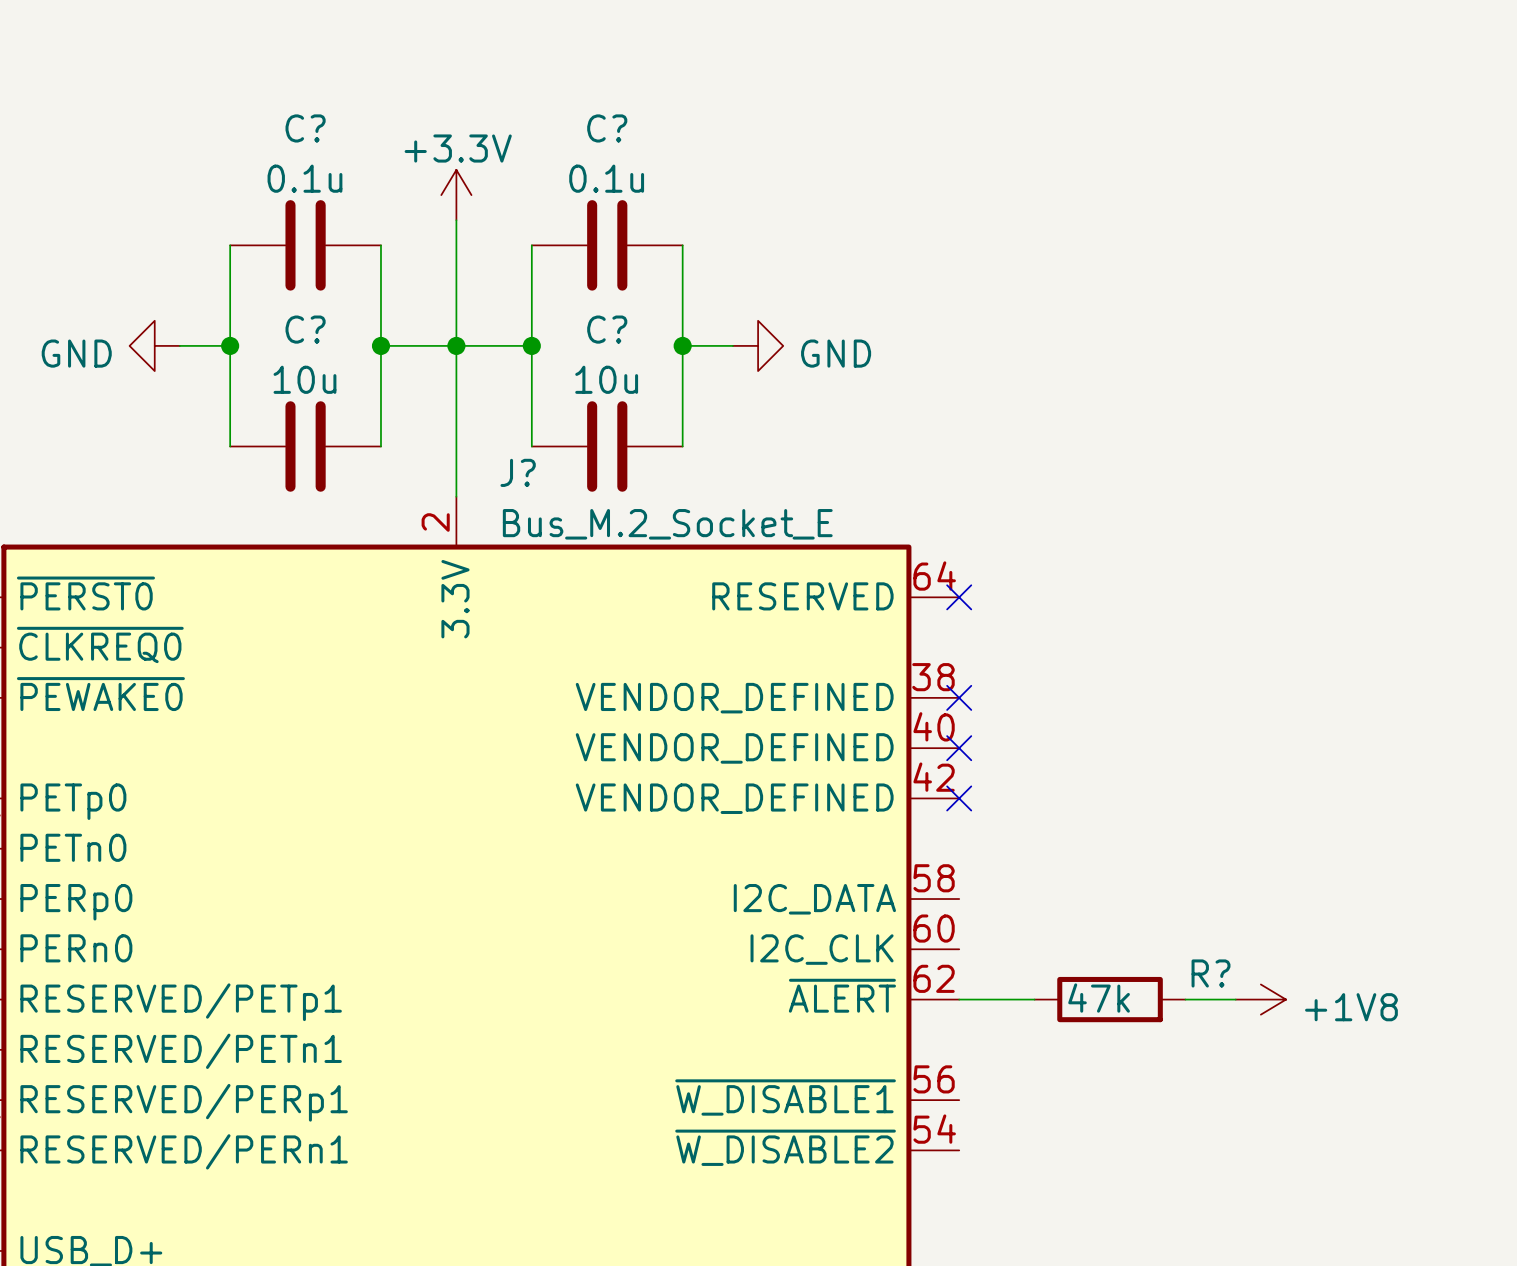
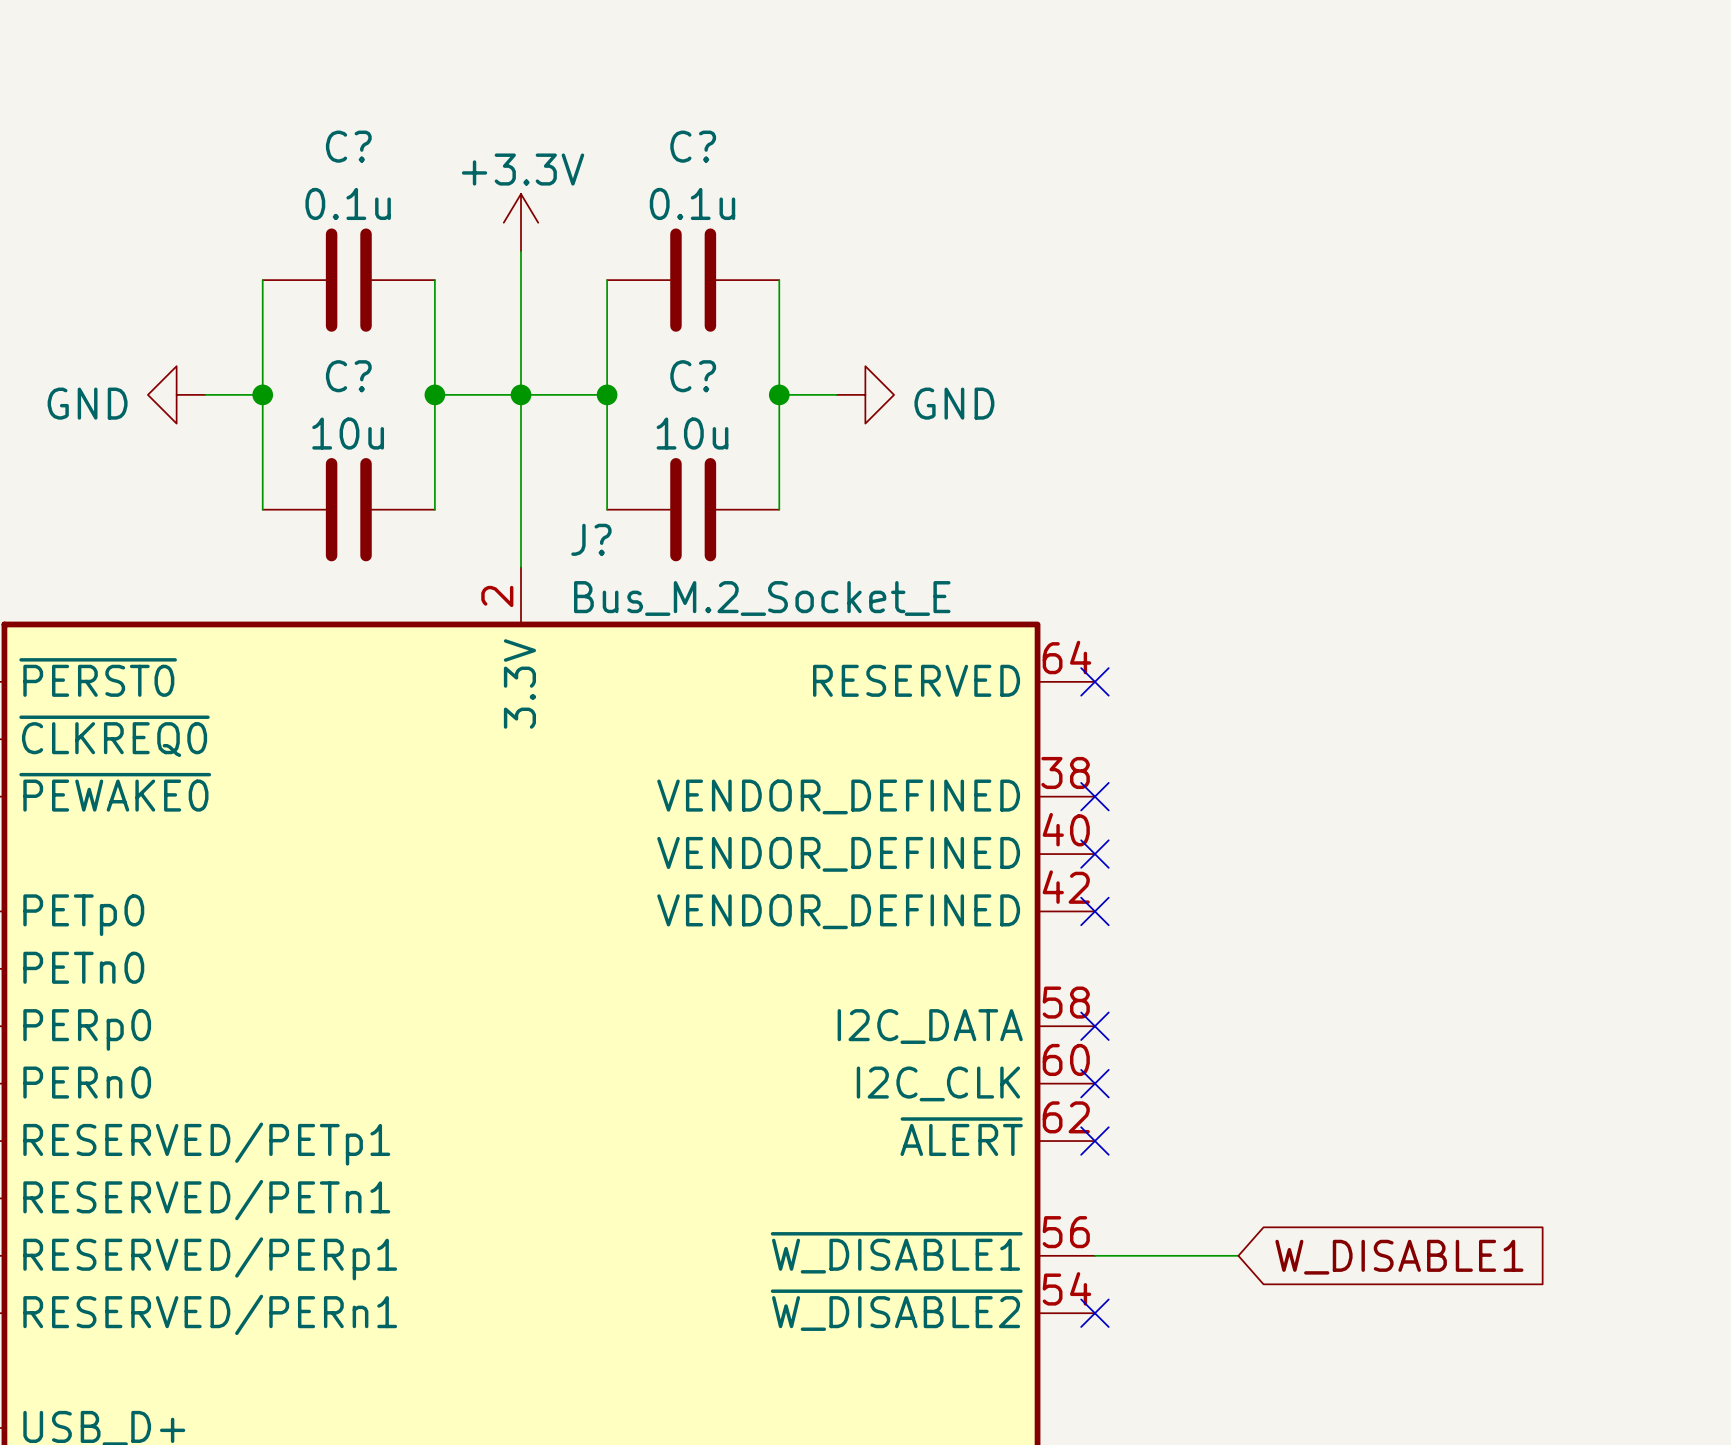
no-connect mark: none -> (1094, 1026)
no-connect mark: none -> (1094, 1083)
wire: (959, 999) (1034, 999) -> none
no-connect mark: none -> (1094, 1141)
R?: 47k (1110, 999) -> none
wire: (1185, 999) (1235, 999) -> none
power symbol: +1V8 (1260, 999) -> none
wire: none -> (1094, 1255) (1238, 1255)
global label: none -> W_DISABLE1 (1399, 1257)
no-connect mark: none -> (1094, 1313)

